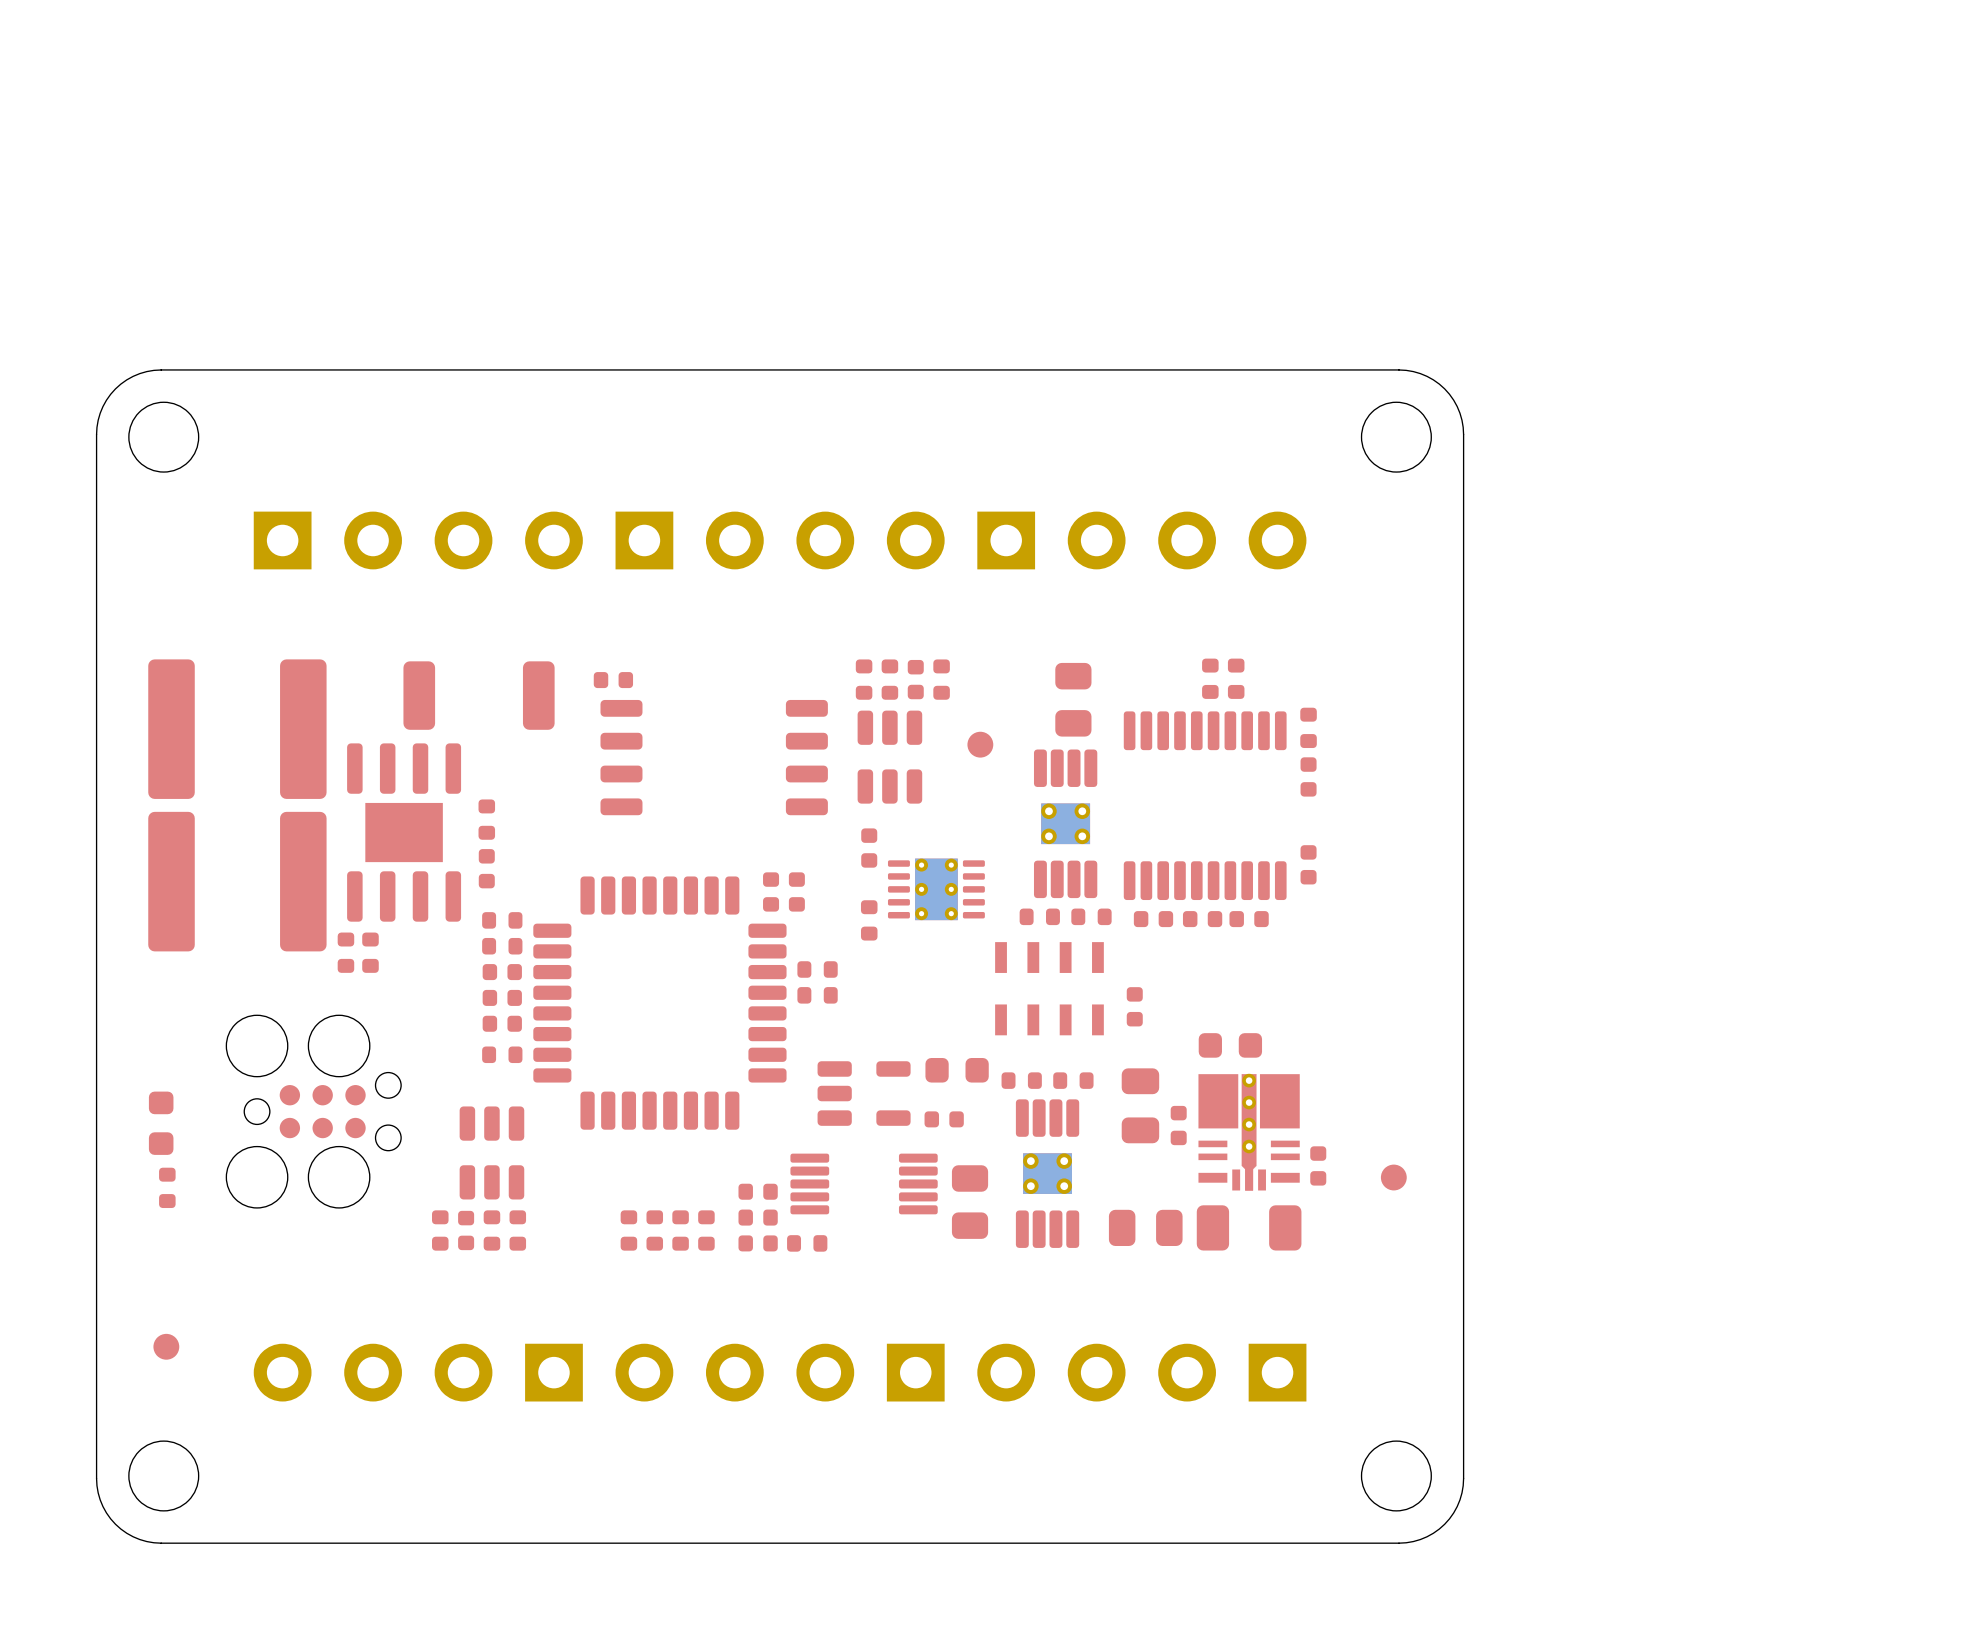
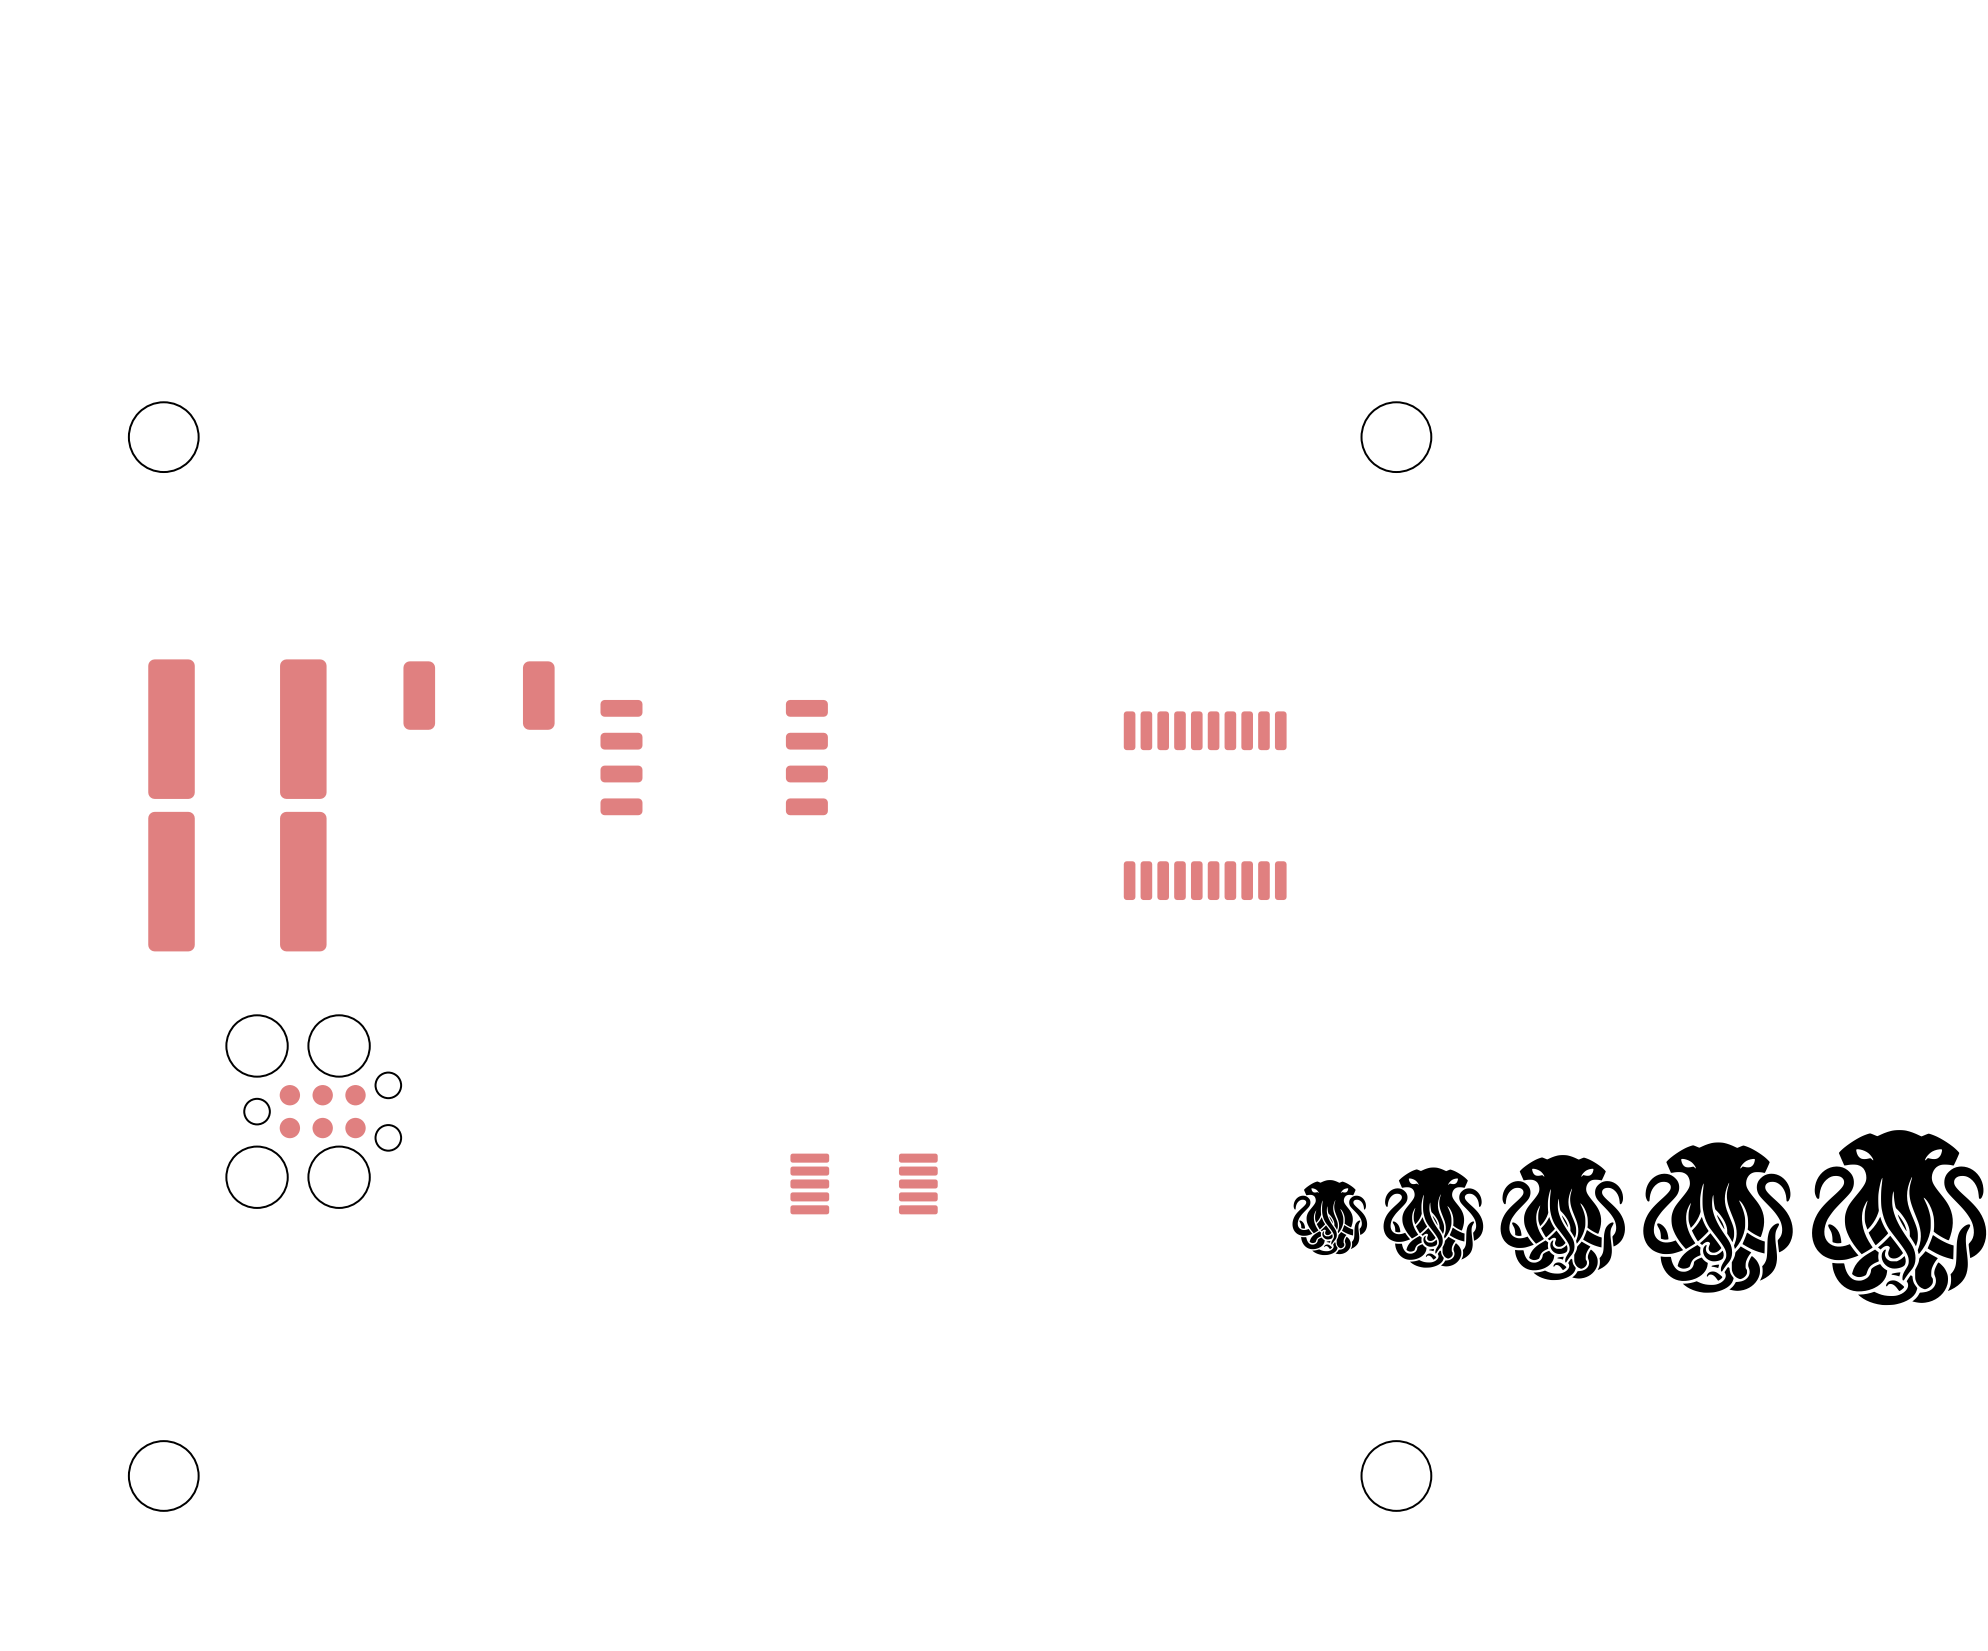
board edge: (1398, 369) (161, 369) (146, 371) (133, 376) (115, 388) (102, 406) (98, 420) (96, 434) (96, 1478) (100, 1499) (106, 1512) (115, 1524) (126, 1533) (139, 1539) (161, 1543) (1398, 1543) (1420, 1539) (1433, 1533) (1444, 1524) (1457, 1506) (1461, 1492) (1463, 1478) (1463, 434) (1461, 420) (1457, 406) (1444, 388) (1427, 376) (1413, 371) (1398, 369) -> none
part: (418, 540) -> none
part: (780, 540) -> none
part: (1141, 540) -> none
part: (1210, 678) -> none
part: (1236, 678) -> none
part: (864, 679) -> none
part: (889, 679) -> none
part: (915, 679) -> none
part: (941, 679) -> none
part: (613, 680) -> none
part: (1073, 699) -> none
part: (1308, 727) -> none
part: (980, 744) -> none
part: (889, 757) -> none
part: (1308, 776) -> none
part: (486, 819) -> none
part: (1065, 823) -> none
part: (404, 832) -> none
part: (869, 848) -> none
part: (1308, 864) -> none
part: (486, 868) -> none
part: (936, 889) -> none
part: (771, 891) -> none
part: (796, 891) -> none
part: (1039, 916) -> none
part: (1091, 916) -> none
part: (1153, 919) -> none
part: (1202, 919) -> none
part: (1249, 919) -> none
part: (502, 920) -> none
part: (869, 920) -> none
part: (502, 946) -> none
part: (345, 952) -> none
part: (370, 952) -> none
part: (817, 969) -> none
part: (502, 972) -> none
part: (1049, 988) -> none
part: (817, 995) -> none
part: (502, 997) -> none
part: (659, 1003) -> none
part: (1134, 1006) -> none
part: (502, 1023) -> none
part: (1230, 1045) -> none
part: (502, 1054) -> none
part: (957, 1070) -> none
part: (1021, 1080) -> none
part: (1073, 1080) -> none
part: (864, 1093) -> none
part: (1140, 1105) -> none
part: (944, 1119) -> none
part: (161, 1123) -> none
part: (1178, 1125) -> none
drawing: none -> [1292, 1130, 1987, 1306]
part: (1249, 1132) -> none
part: (491, 1152) -> none
part: (1318, 1165) -> none
part: (1047, 1173) -> none
part: (1393, 1177) -> none
part: (167, 1187) -> none
part: (758, 1191) -> none
part: (970, 1202) -> none
part: (758, 1217) -> none
part: (1145, 1227) -> none
part: (1249, 1227) -> none
part: (440, 1230) -> none
part: (466, 1230) -> none
part: (491, 1230) -> none
part: (517, 1230) -> none
part: (628, 1230) -> none
part: (654, 1230) -> none
part: (680, 1230) -> none
part: (706, 1230) -> none
part: (758, 1243) -> none
part: (807, 1243) -> none
part: (166, 1346) -> none
part: (418, 1372) -> none
part: (780, 1372) -> none
part: (1141, 1372) -> none

